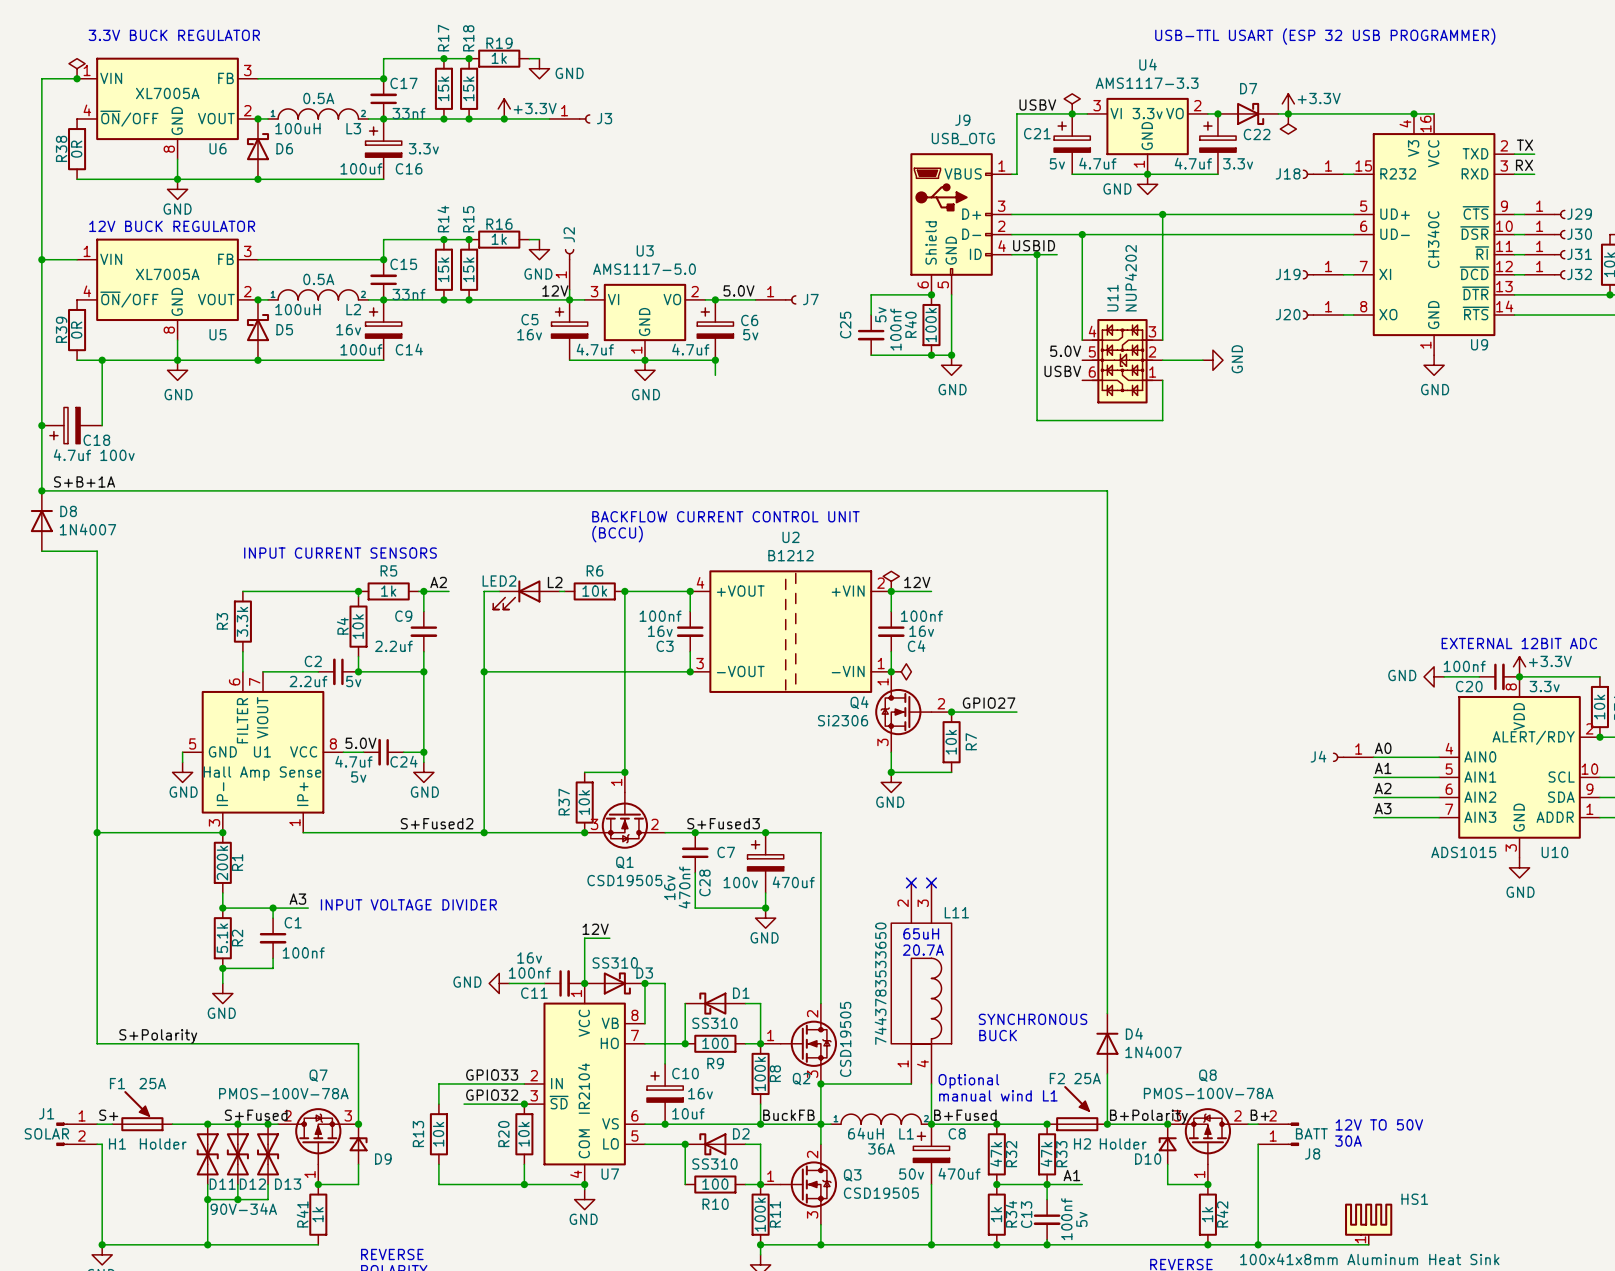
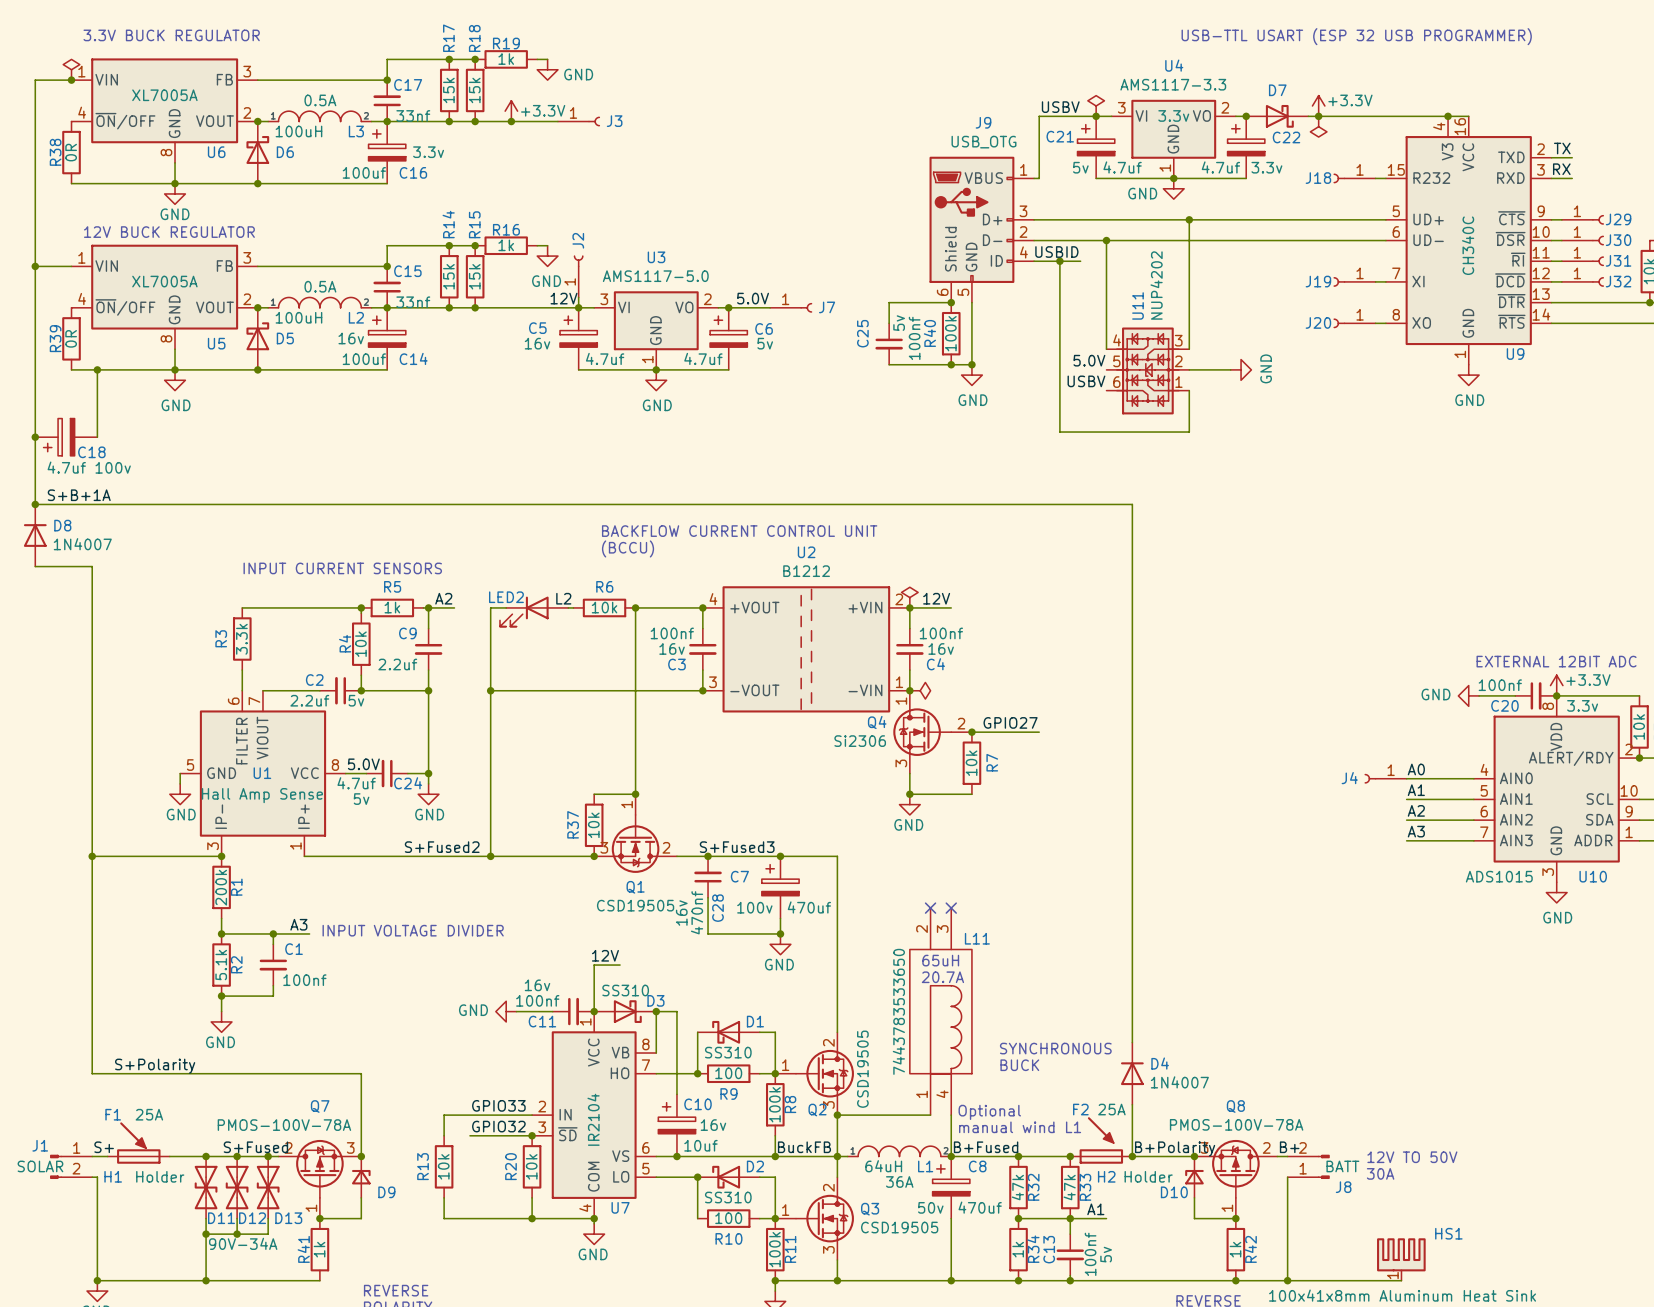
wire: (715, 360) (715, 375) -> none
junction: (715, 360) -> none

